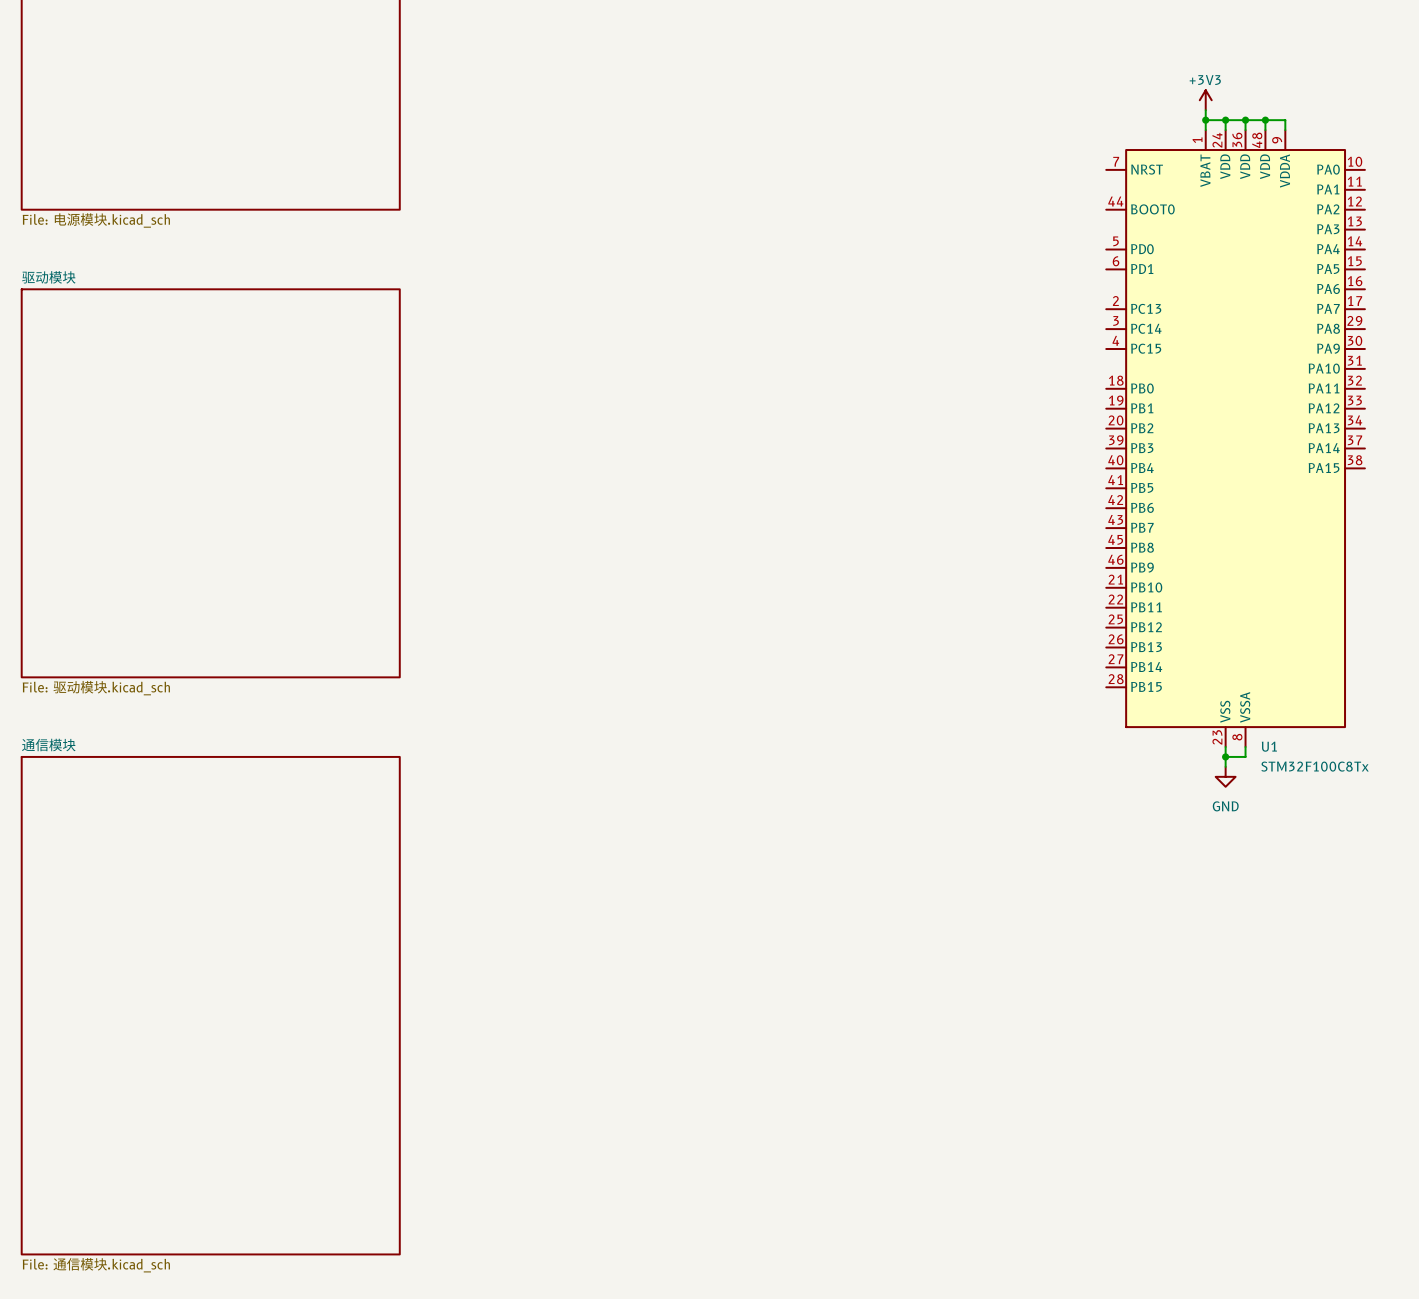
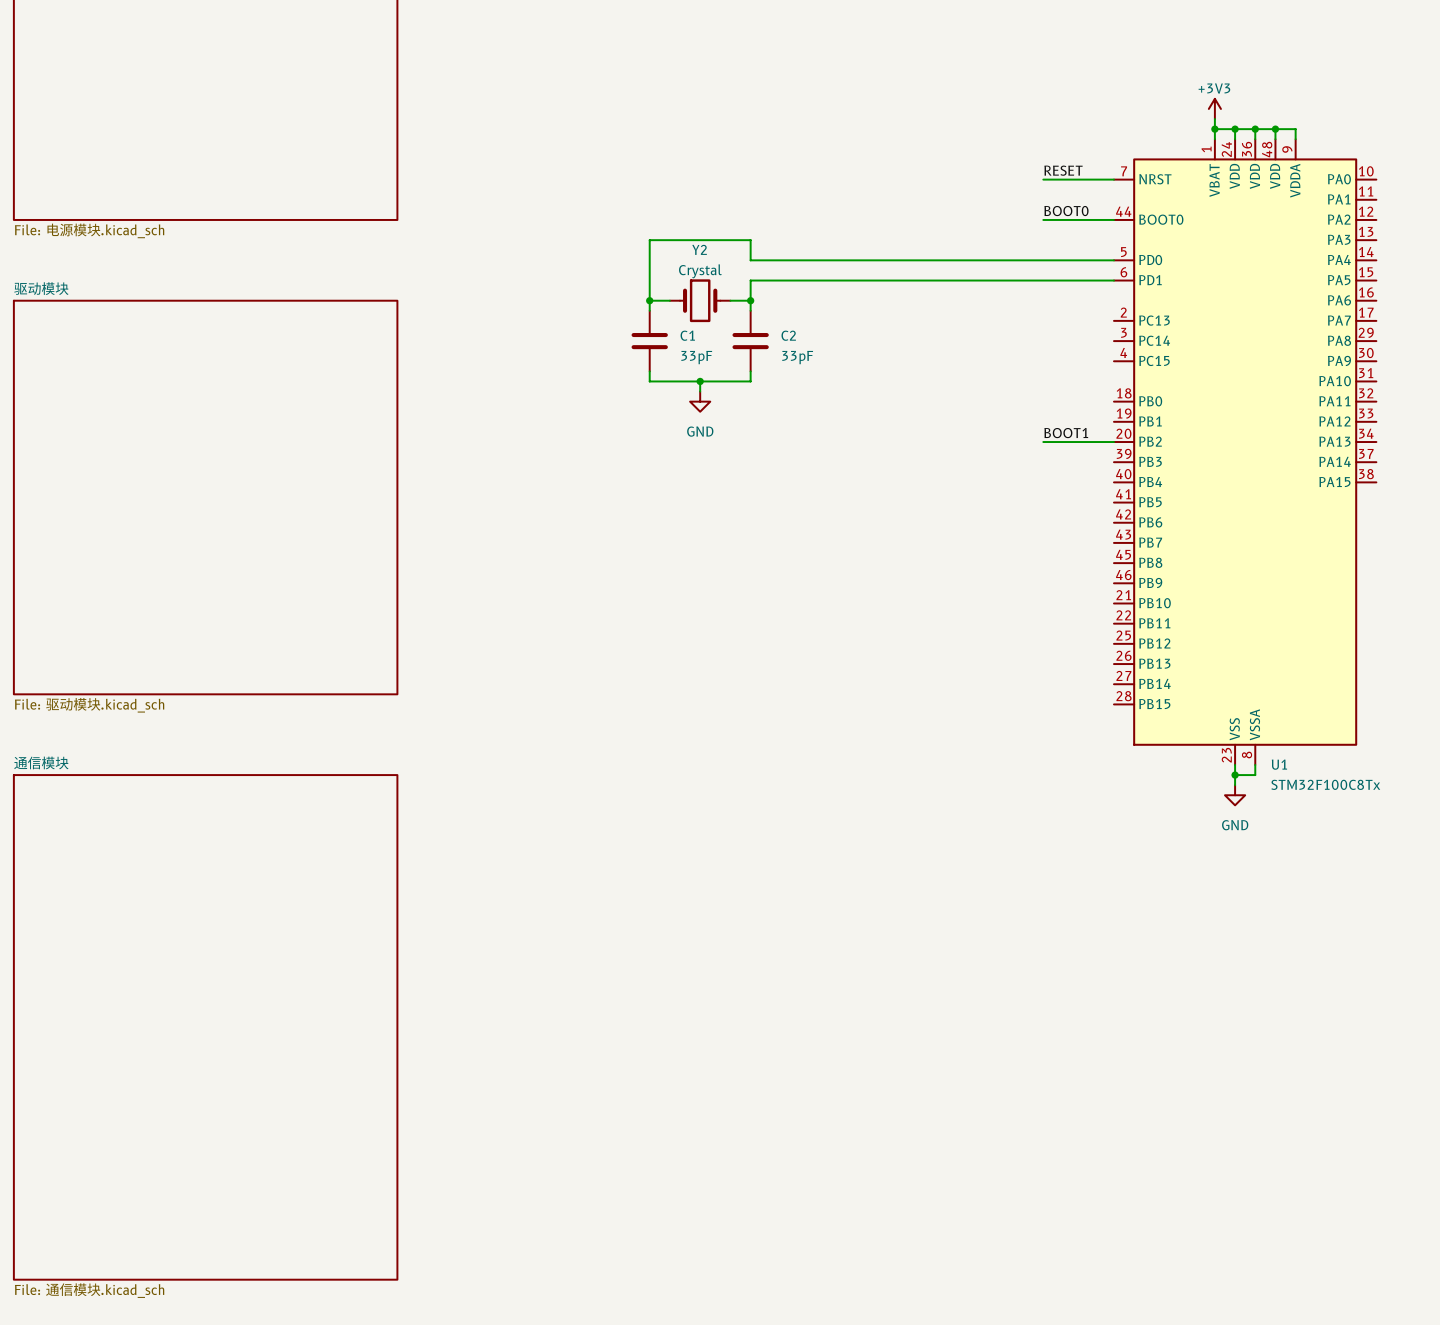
label: none -> RESET (1063, 170)
wire: none -> (1043, 179) (1113, 179)
label: none -> BOOT0 (1066, 211)
wire: none -> (1043, 219) (1113, 219)
wire: none -> (1113, 260) (750, 260) (750, 240) (649, 240) (649, 310)
wire: none -> (1113, 280) (750, 280) (750, 310)
wire: none -> (649, 300) (669, 300)
junction: none -> (649, 300)
Y2: none -> Crystal (700, 300)
wire: none -> (730, 300) (750, 300)
junction: none -> (750, 300)
C1: none -> 33pF (649, 341)
C2: none -> 33pF (750, 341)
wire: none -> (649, 371) (649, 381) (750, 381) (750, 371)
wire: none -> (700, 381) (700, 391)
junction: none -> (700, 381)
power symbol: none -> GND (700, 401)
label: none -> BOOT1 (1066, 433)
wire: none -> (1043, 442) (1113, 442)

